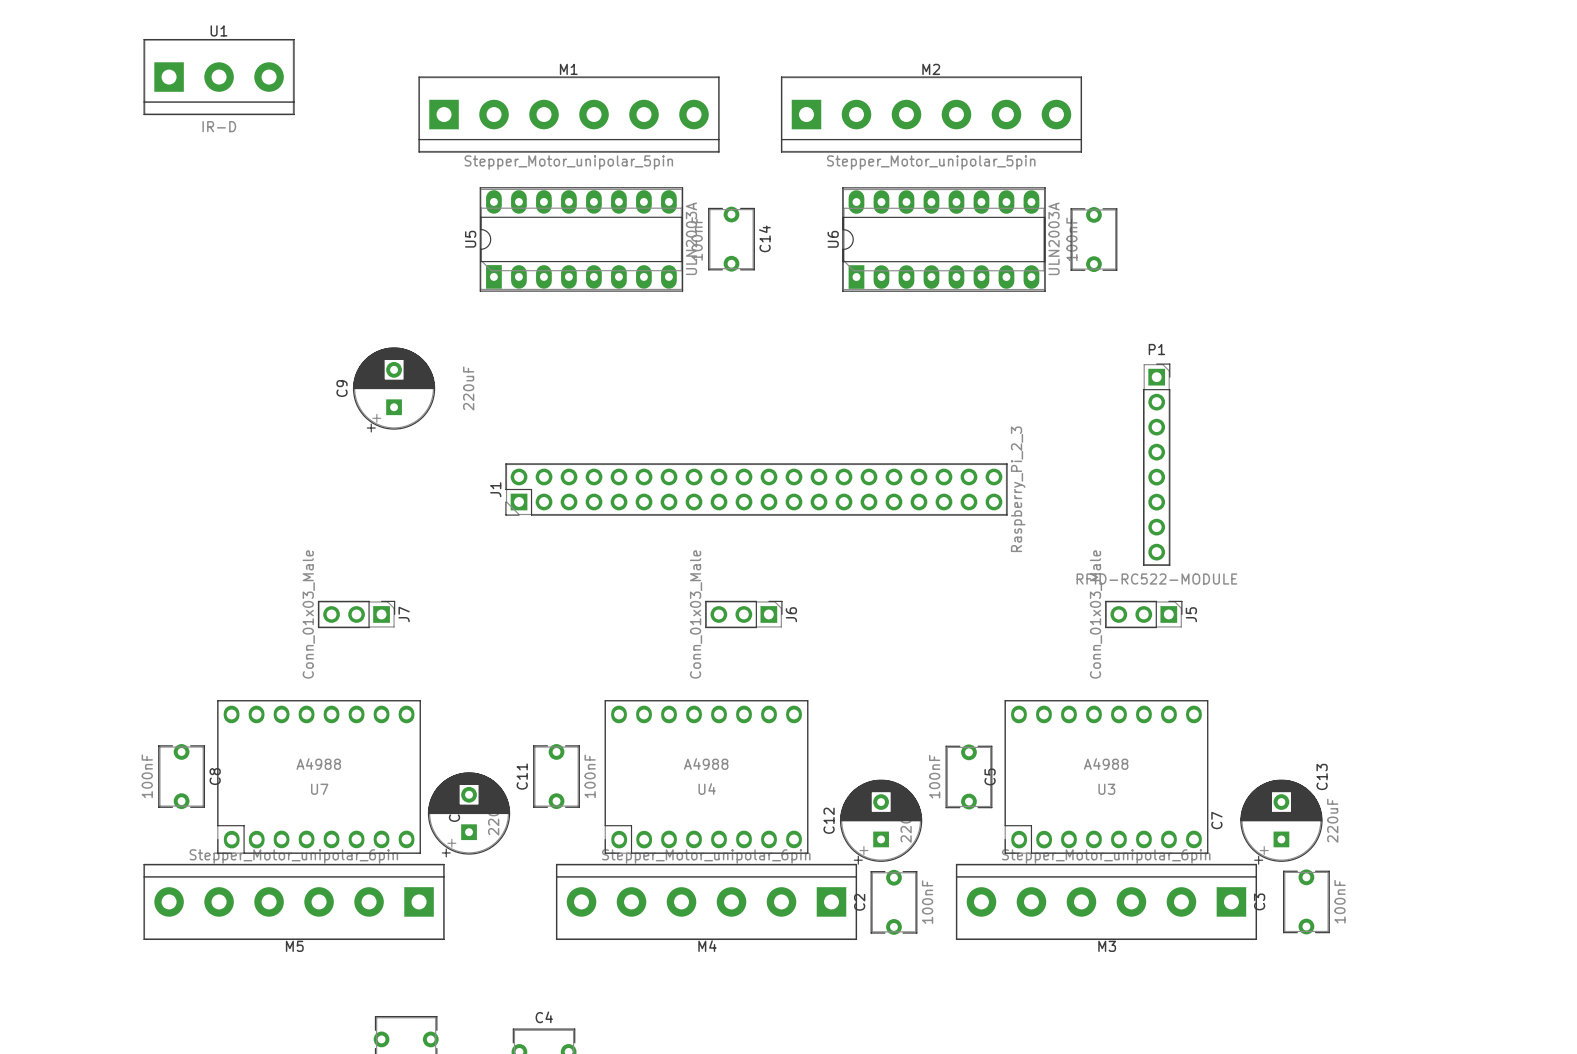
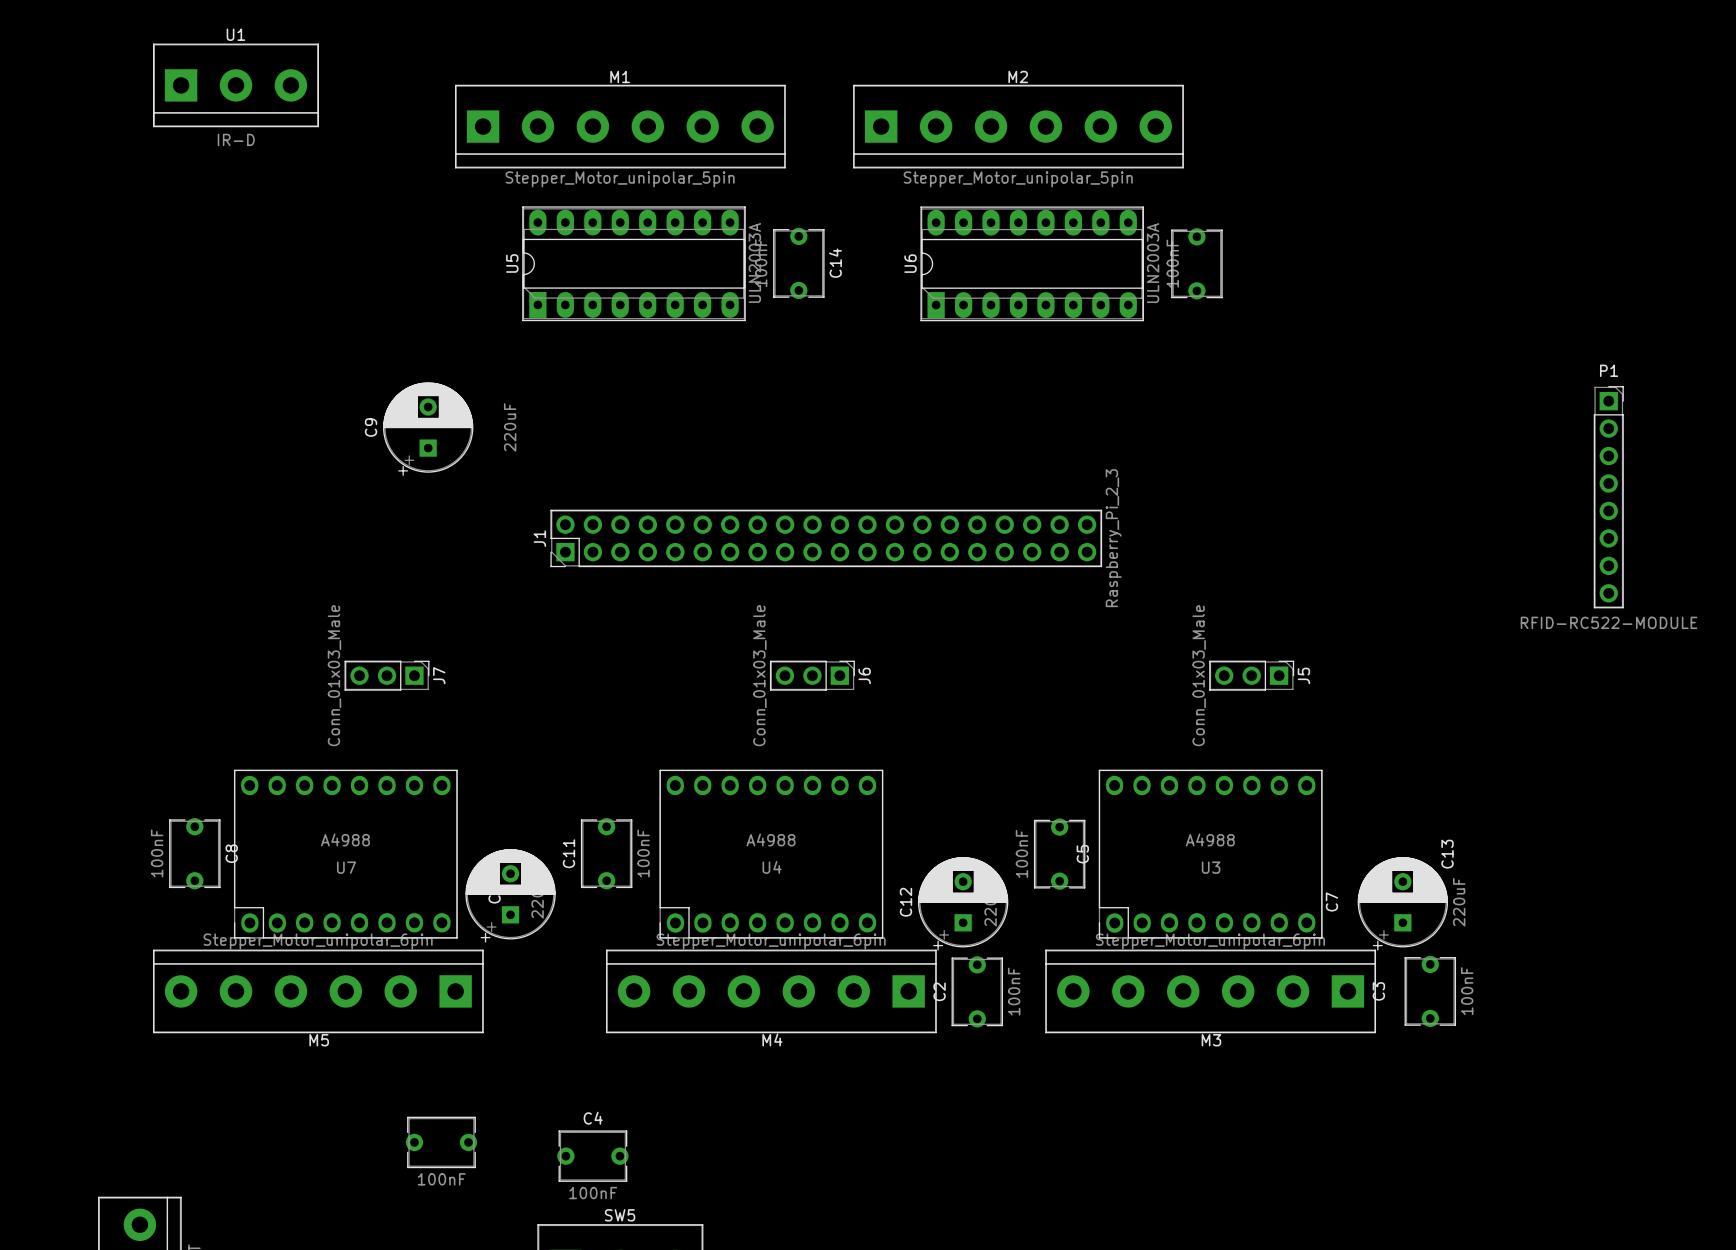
P1 position: (1156, 464) -> (1608, 497)

